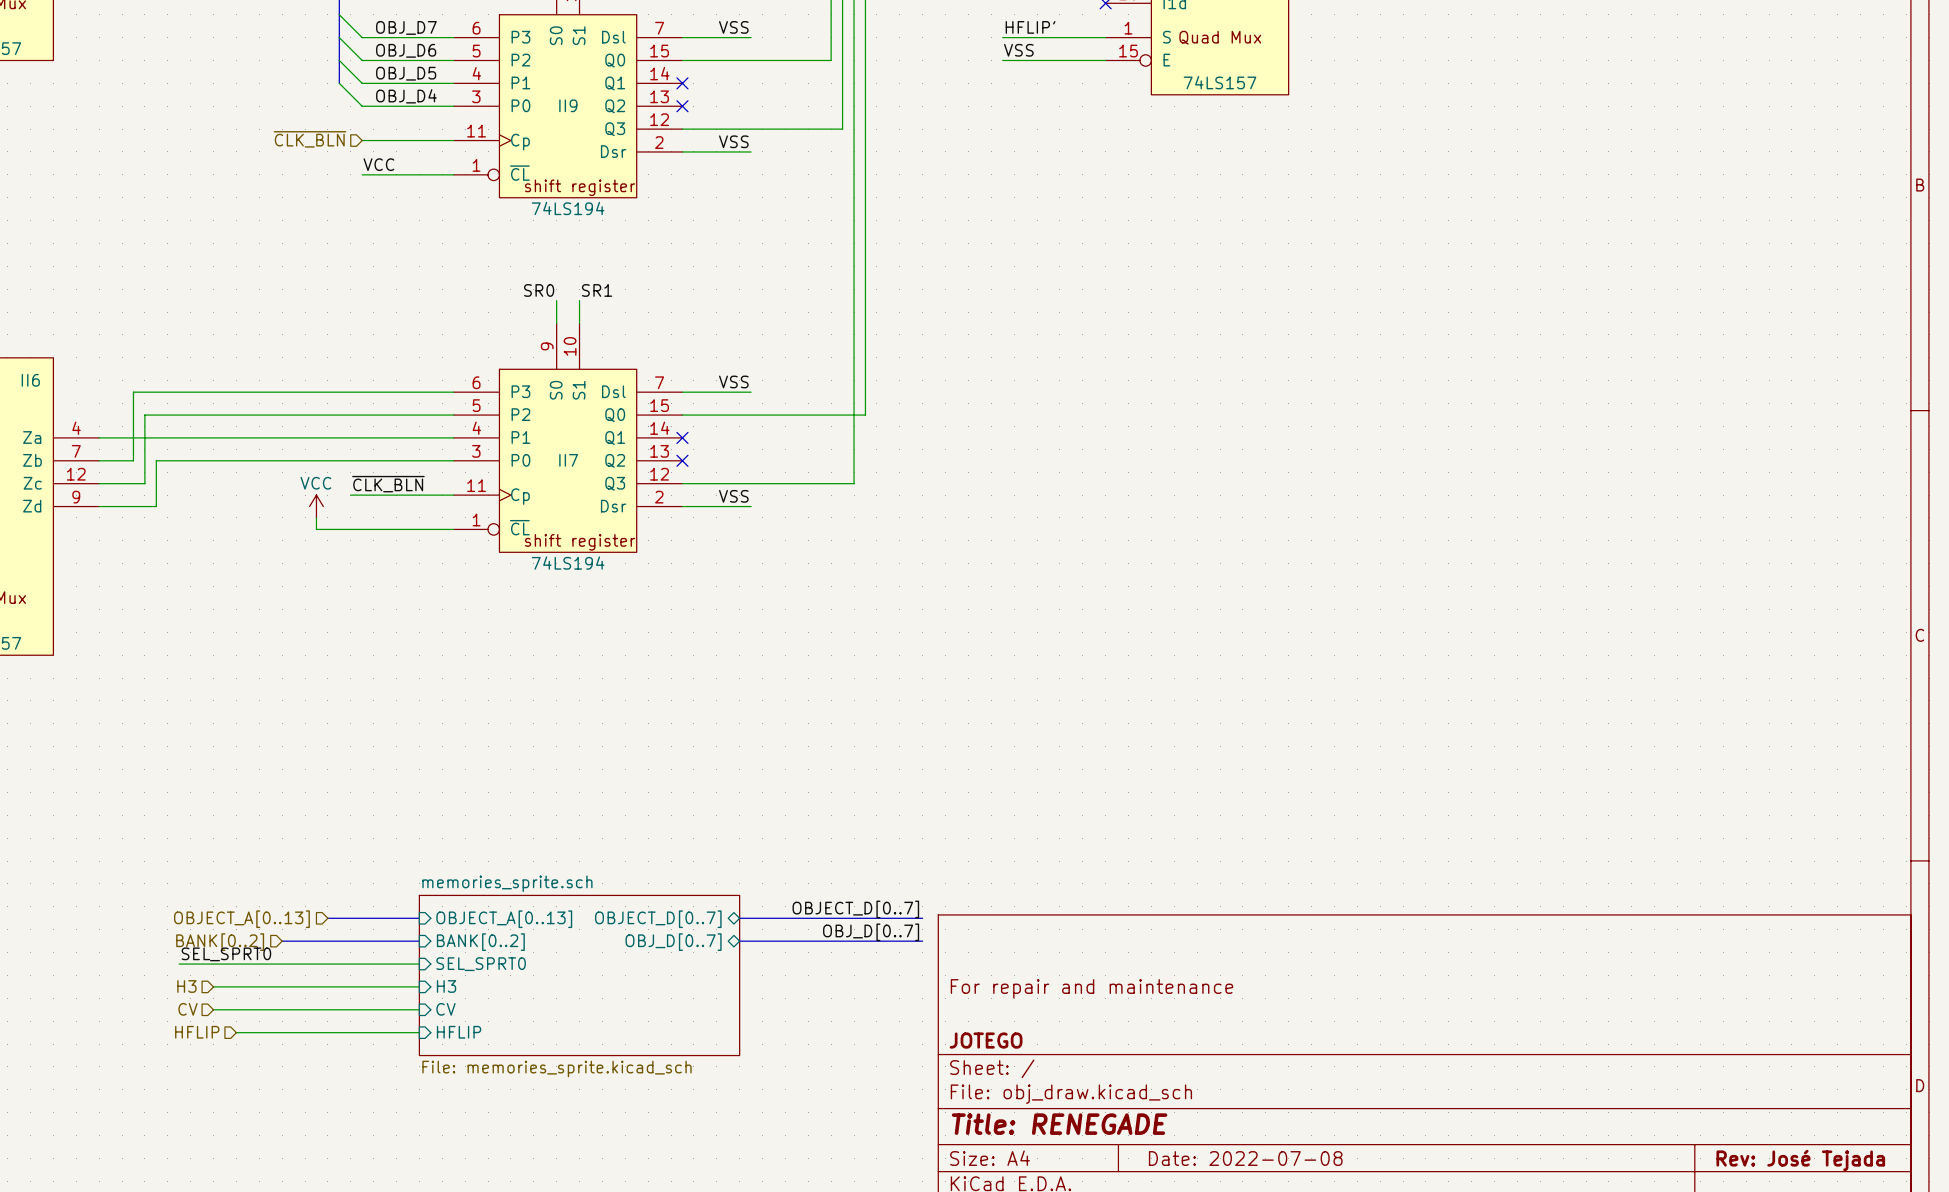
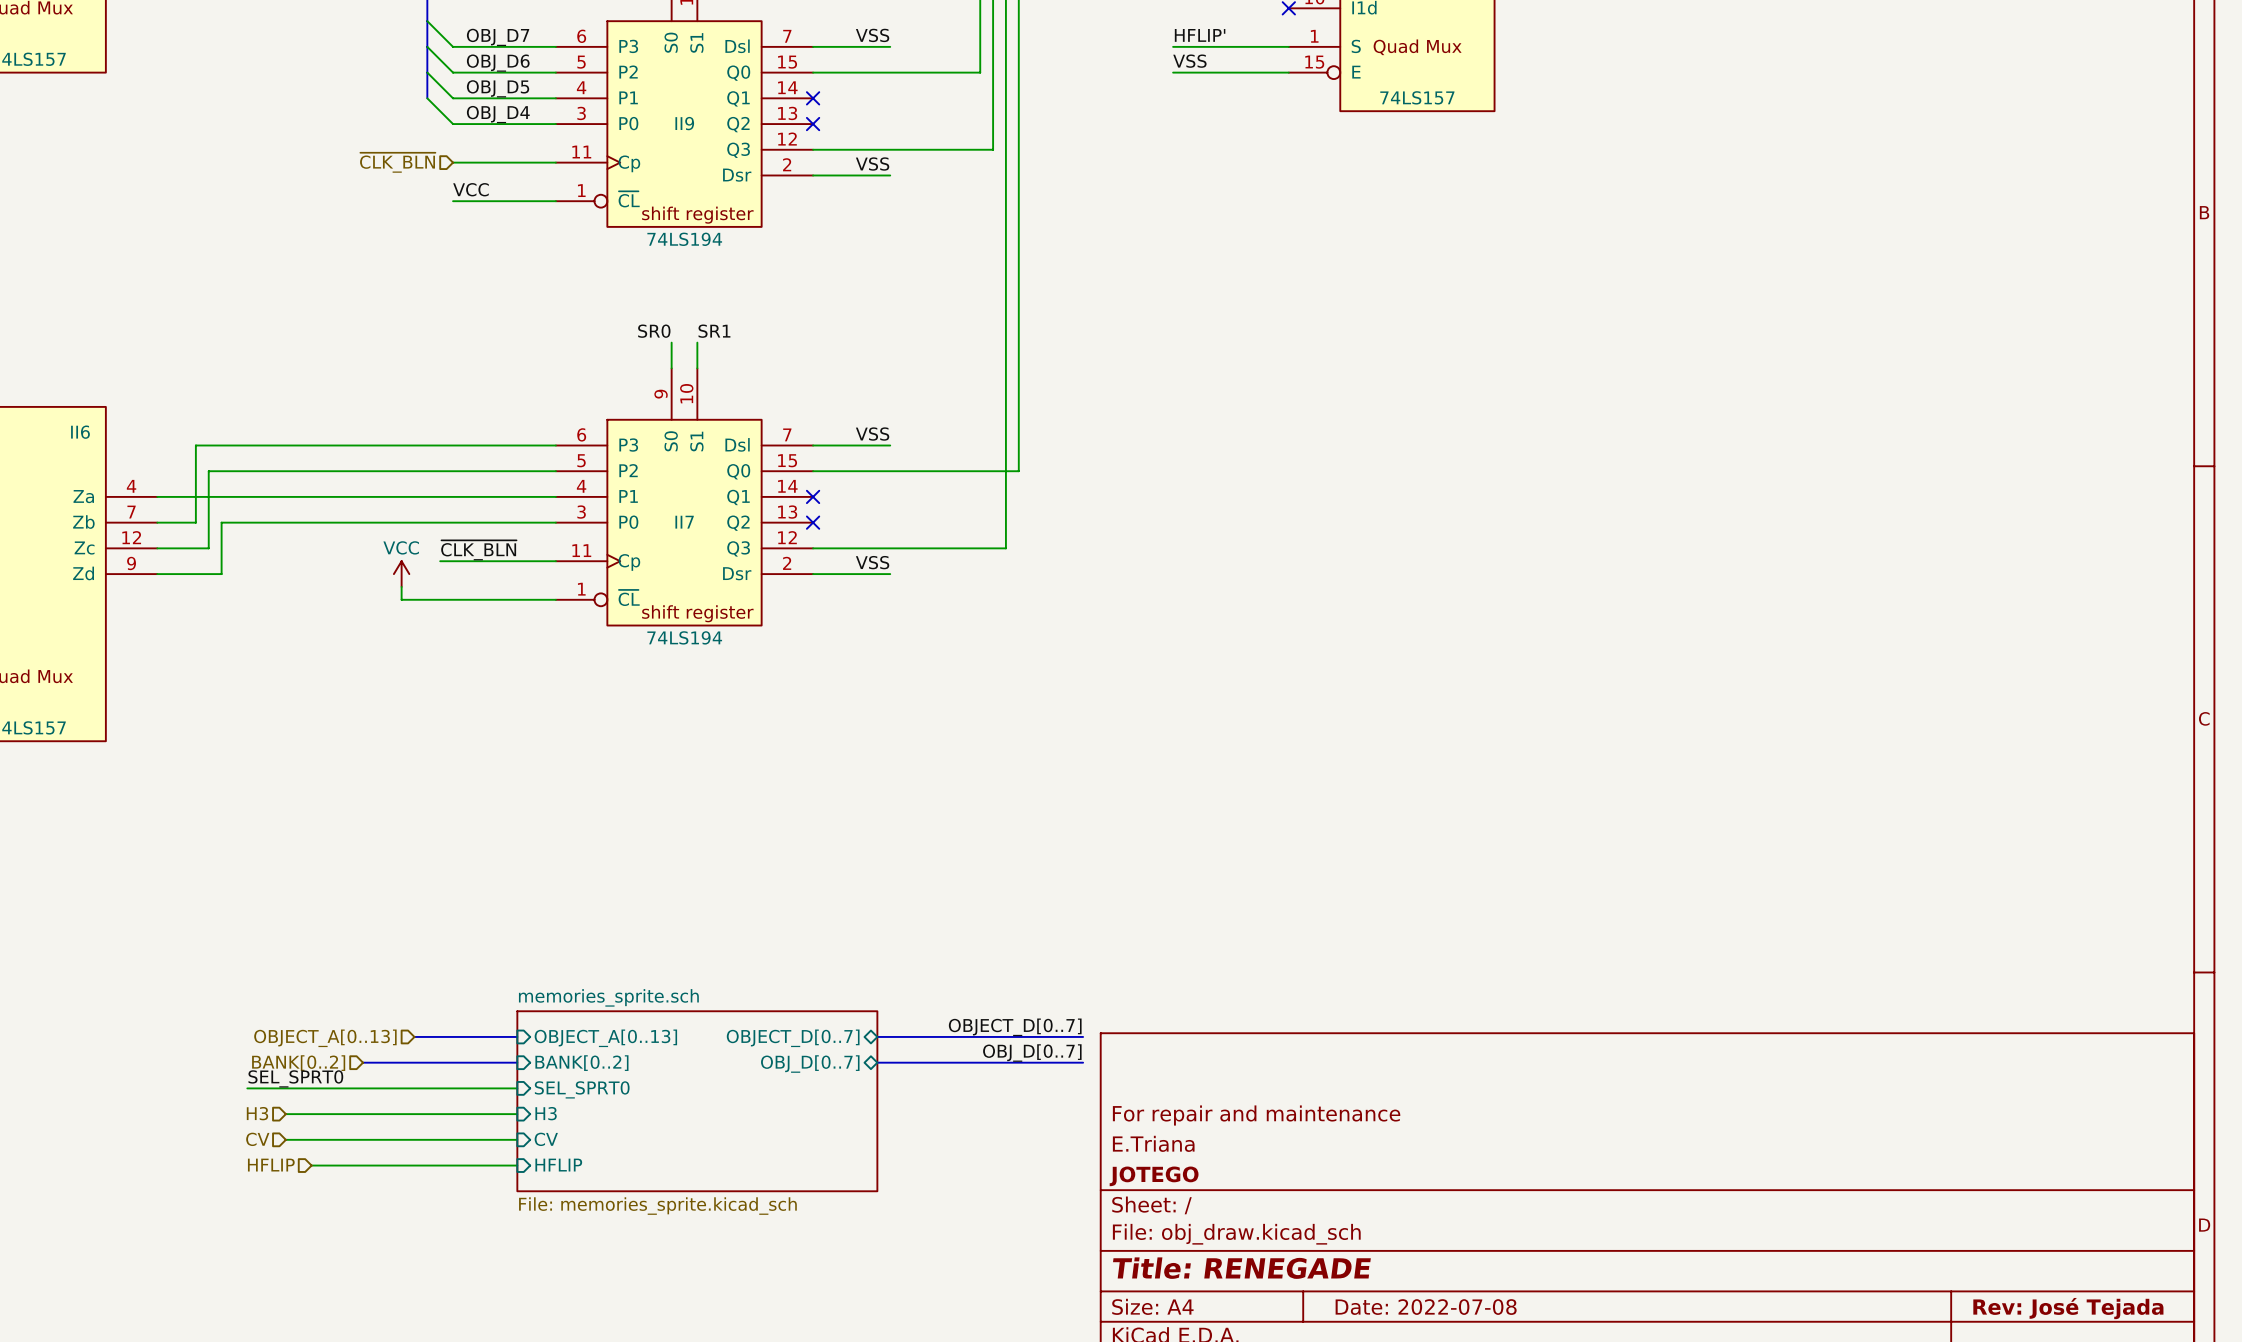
title block: none -> E.Triana (1153, 1143)

